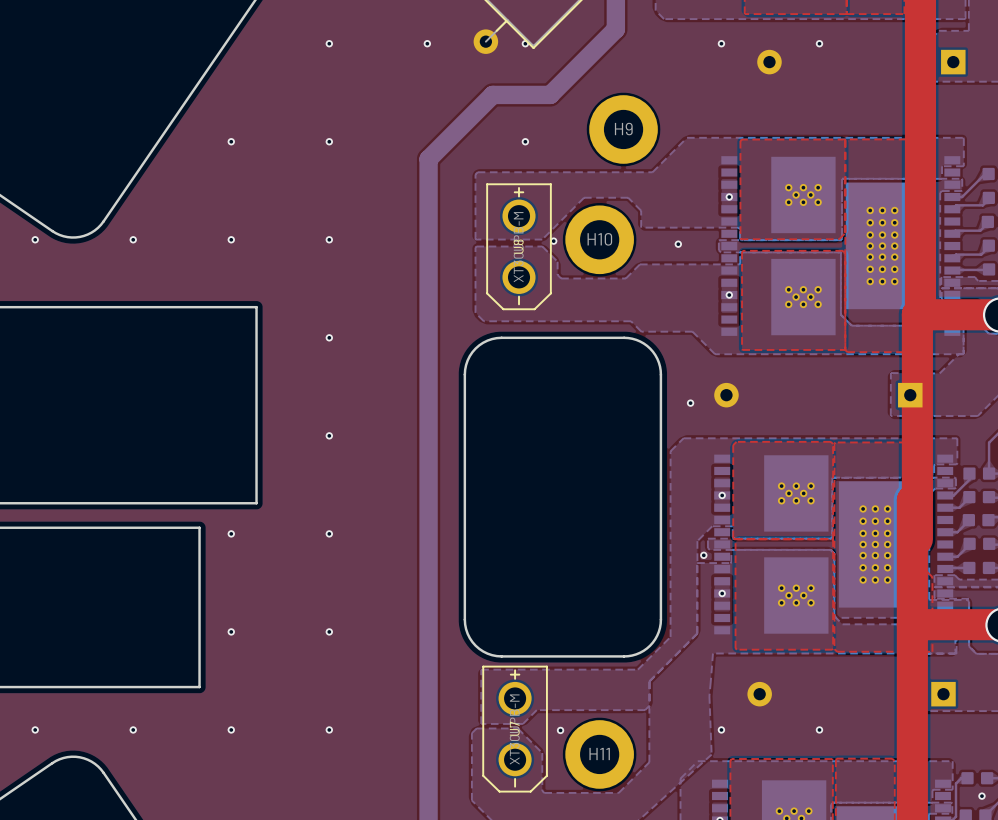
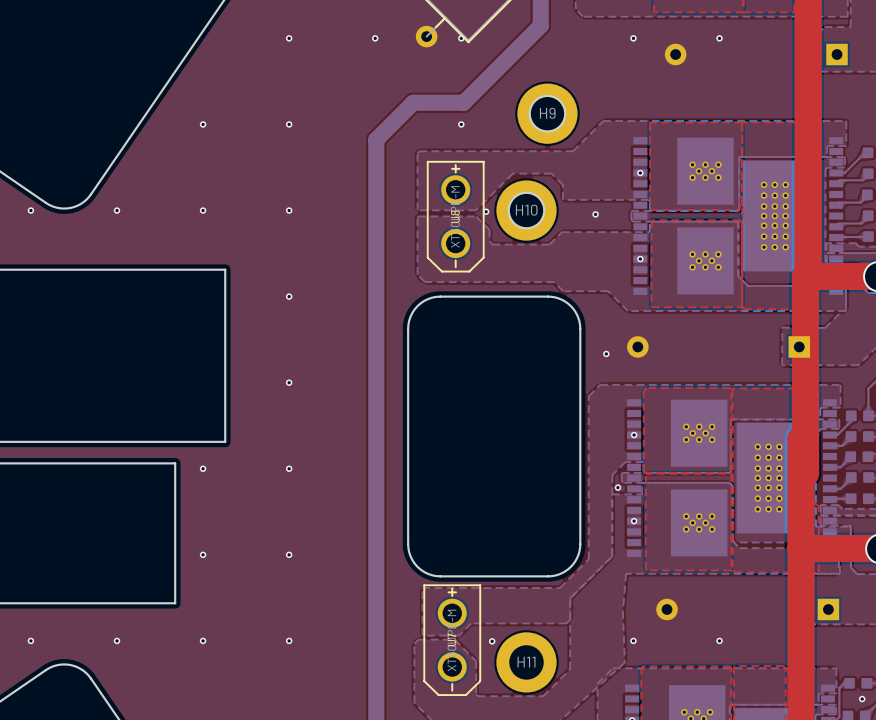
bottom track: (550, 94) (492, 94) (470, 116) -> (483, 83) (463, 102) (413, 102)
round board edge: none -> [528, 94, 567, 133]
round board edge: none -> [507, 191, 546, 230]

